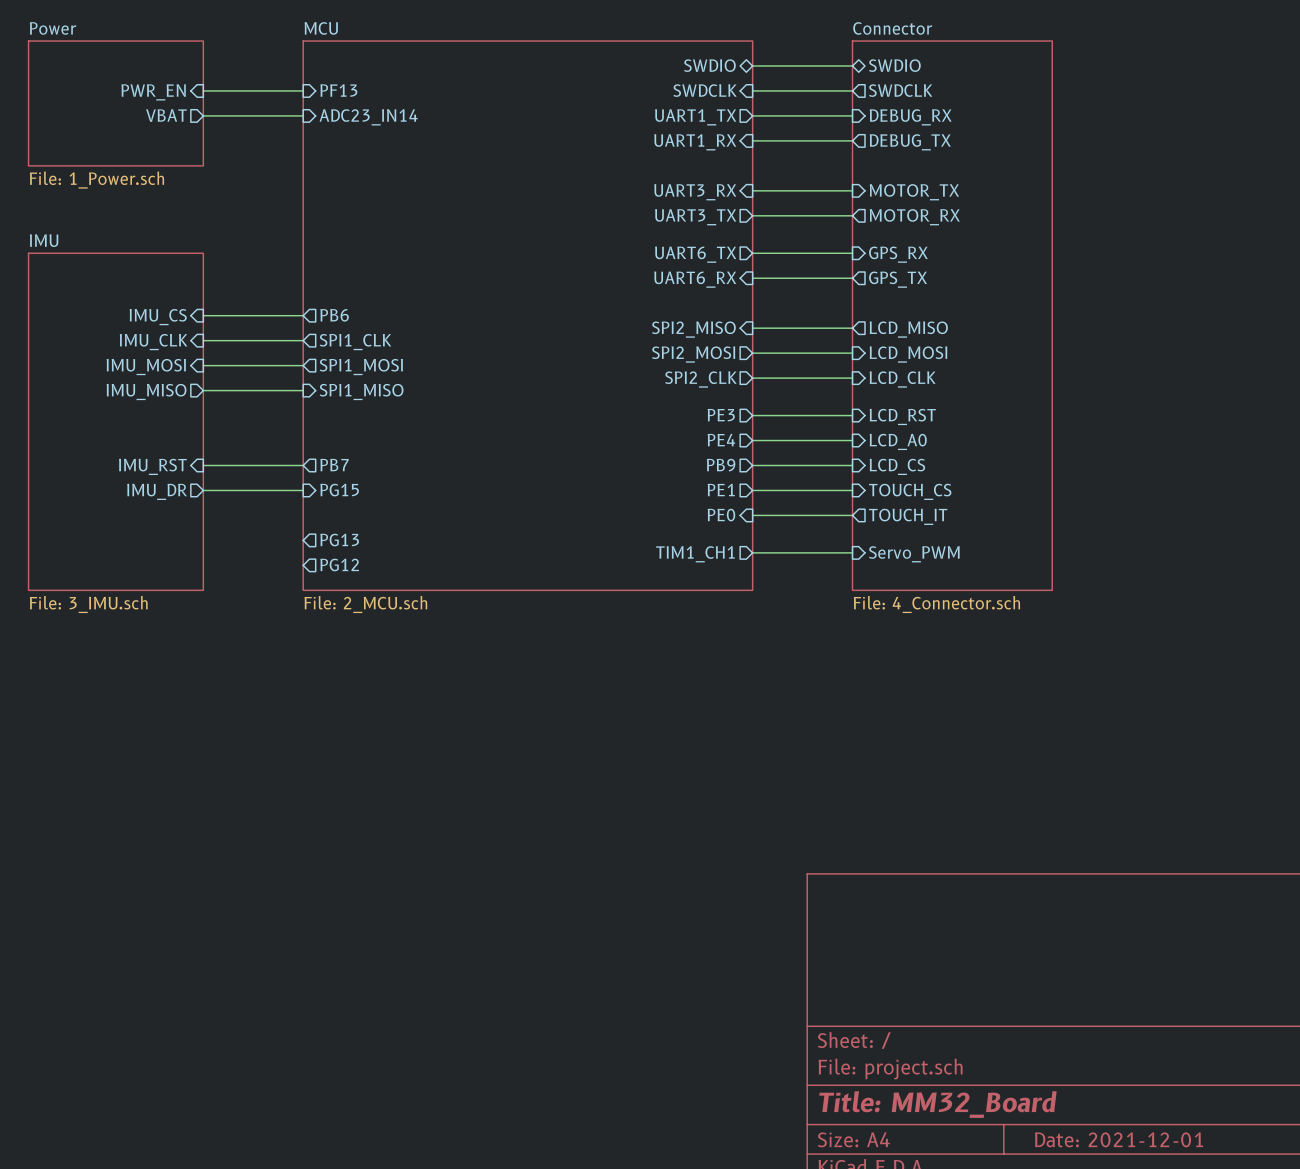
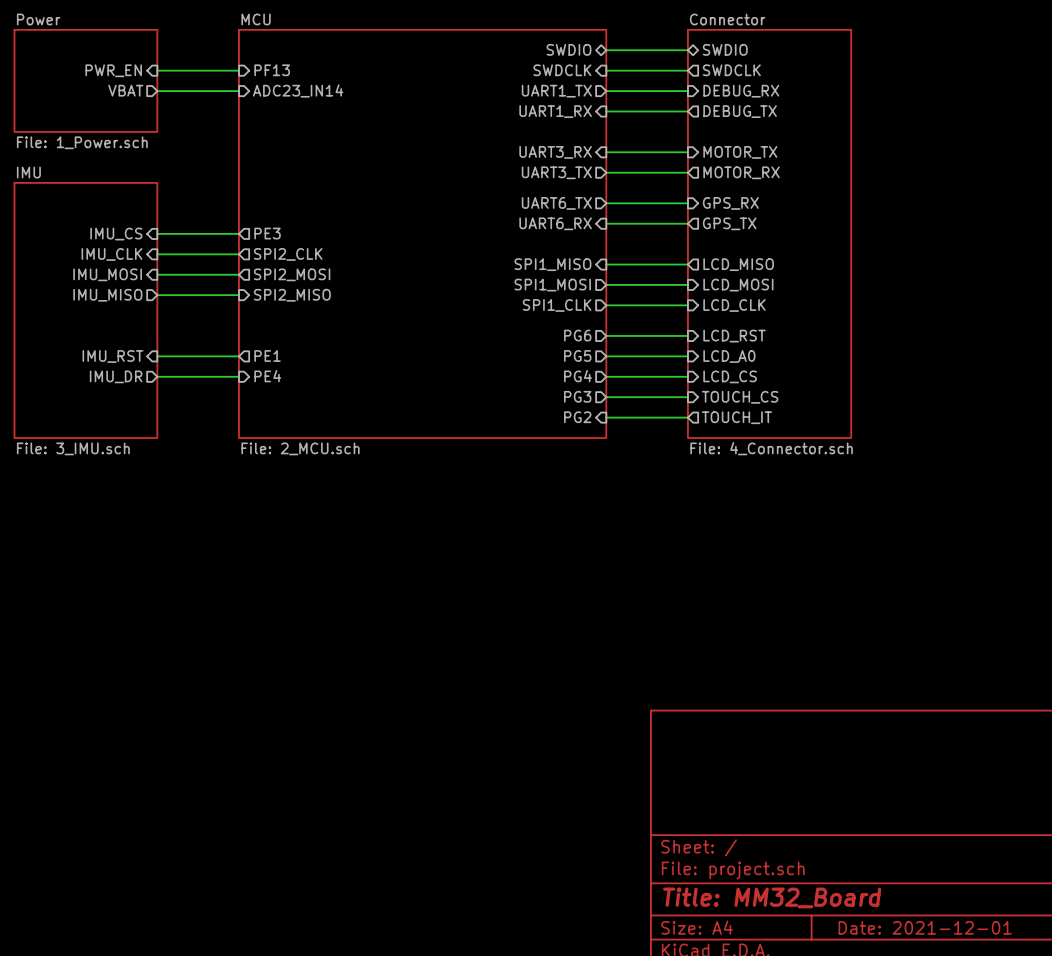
sheet pin: none -> PE3 (267, 233)
sheet MCU: none -> File: 2_MCU.sch (422, 233)
sheet Connector: none -> File: 4_Connector.sch (769, 233)
sheet pin: none -> IMU_CS (116, 234)
sheet pin: PB6 (334, 315) -> SPI2_CLK (288, 254)
sheet MCU: File: 2_MCU.sch (527, 315) -> none
sheet Connector: File: 4_Connector.sch (952, 315) -> none
sheet pin: IMU_CS (158, 317) -> IMU_CLK (111, 254)
sheet pin: SPI2_MISO (693, 329) -> SPI1_MISO (552, 264)
sheet pin: IMU_CLK (153, 342) -> IMU_MOSI (107, 274)
sheet pin: SPI1_CLK (355, 342) -> SPI2_MOSI (292, 274)
sheet pin: SPI2_MOSI (693, 354) -> SPI1_MOSI (552, 285)
sheet pin shape: input (146, 367) -> output (107, 295)
sheet pin: IMU_MOSI (146, 367) -> IMU_MISO (107, 295)
sheet pin shape: output (361, 367) -> input (292, 295)
sheet pin: SPI1_MOSI (361, 367) -> SPI2_MISO (292, 295)
sheet pin: SPI2_CLK (700, 379) -> SPI1_CLK (557, 305)
sheet IMU: none -> File: 3_IMU.sch (85, 310)
wire: (203, 390) (303, 390) -> (157, 356) (238, 356)
sheet pin: IMU_MISO (146, 392) -> none
sheet pin: SPI1_MISO (361, 392) -> none
sheet pin: PE3 (721, 415) -> PG6 (577, 335)
sheet IMU: File: 3_IMU.sch (115, 421) -> none
sheet pin: none -> PE1 (267, 355)
sheet pin: PE4 (721, 440) -> PG5 (577, 355)
sheet pin: none -> IMU_RST (112, 356)
sheet pin shape: output (334, 465) -> input (267, 376)
sheet pin: PB7 (334, 465) -> PE4 (267, 376)
sheet pin: PB9 (721, 465) -> PG4 (577, 376)
sheet pin shape: input (152, 466) -> output (116, 376)
sheet pin: IMU_RST (152, 466) -> IMU_DR (116, 376)
wire: (203, 490) (303, 490) -> (157, 233) (238, 233)
sheet pin: PG15 (339, 490) -> none
sheet pin: PE1 (721, 490) -> PG3 (577, 396)
sheet pin: IMU_DR (157, 491) -> none
sheet pin: PE0 (721, 515) -> PG2 (577, 417)
sheet pin: PG13 (339, 540) -> none
wire: (752, 552) (852, 552) -> none
sheet pin: TIM1_CH1 (695, 554) -> none
sheet pin: Servo_PWM (914, 554) -> none
sheet pin: PG12 (339, 564) -> none

